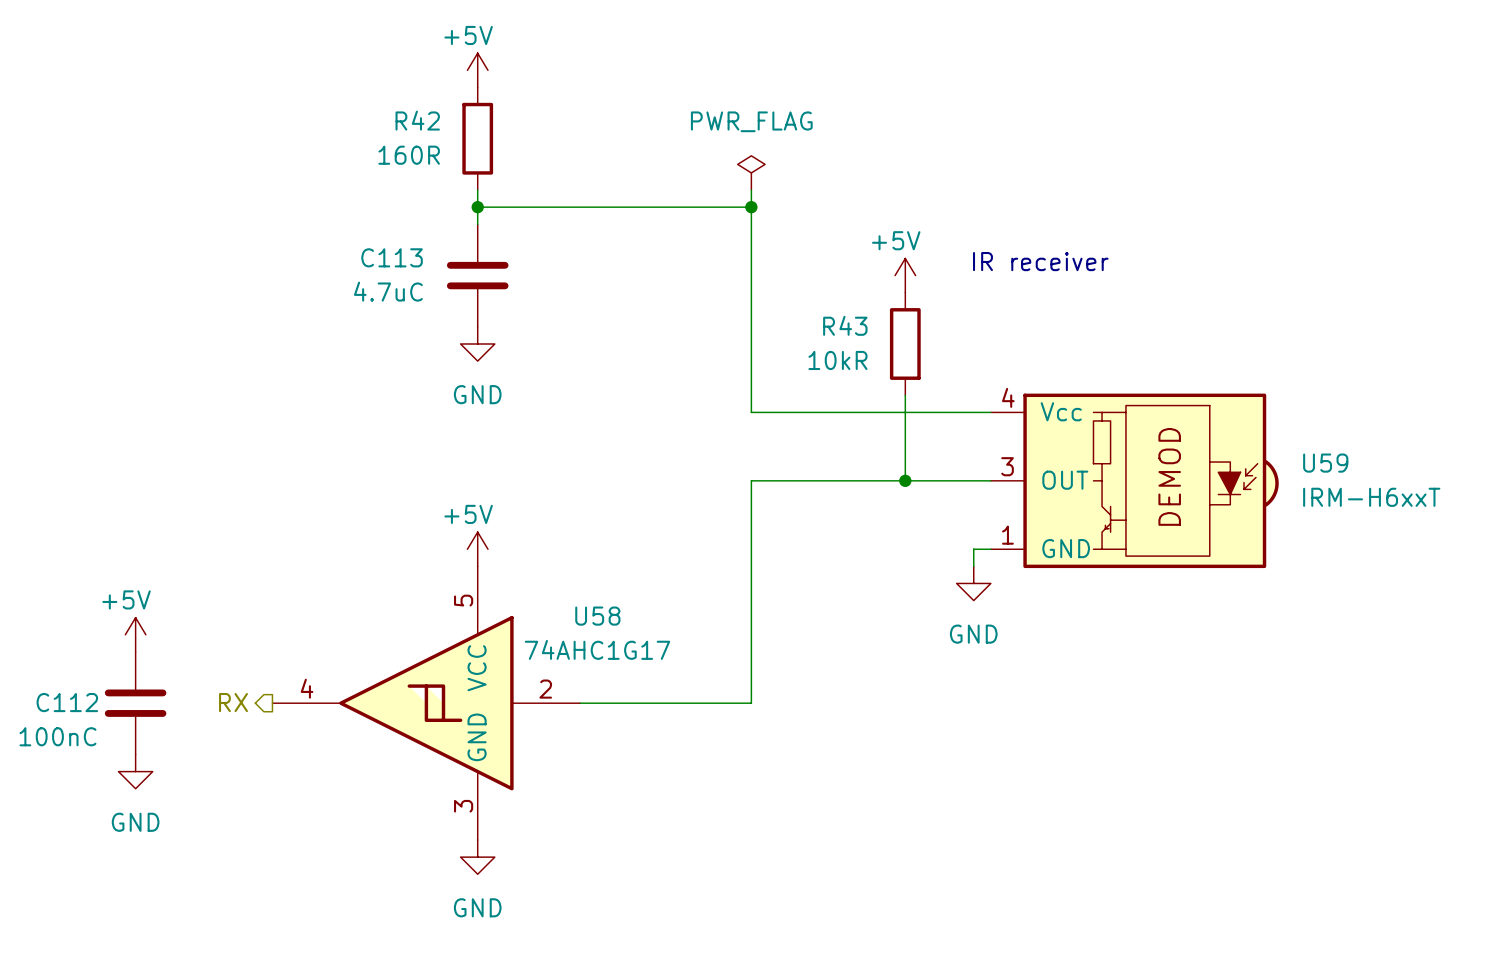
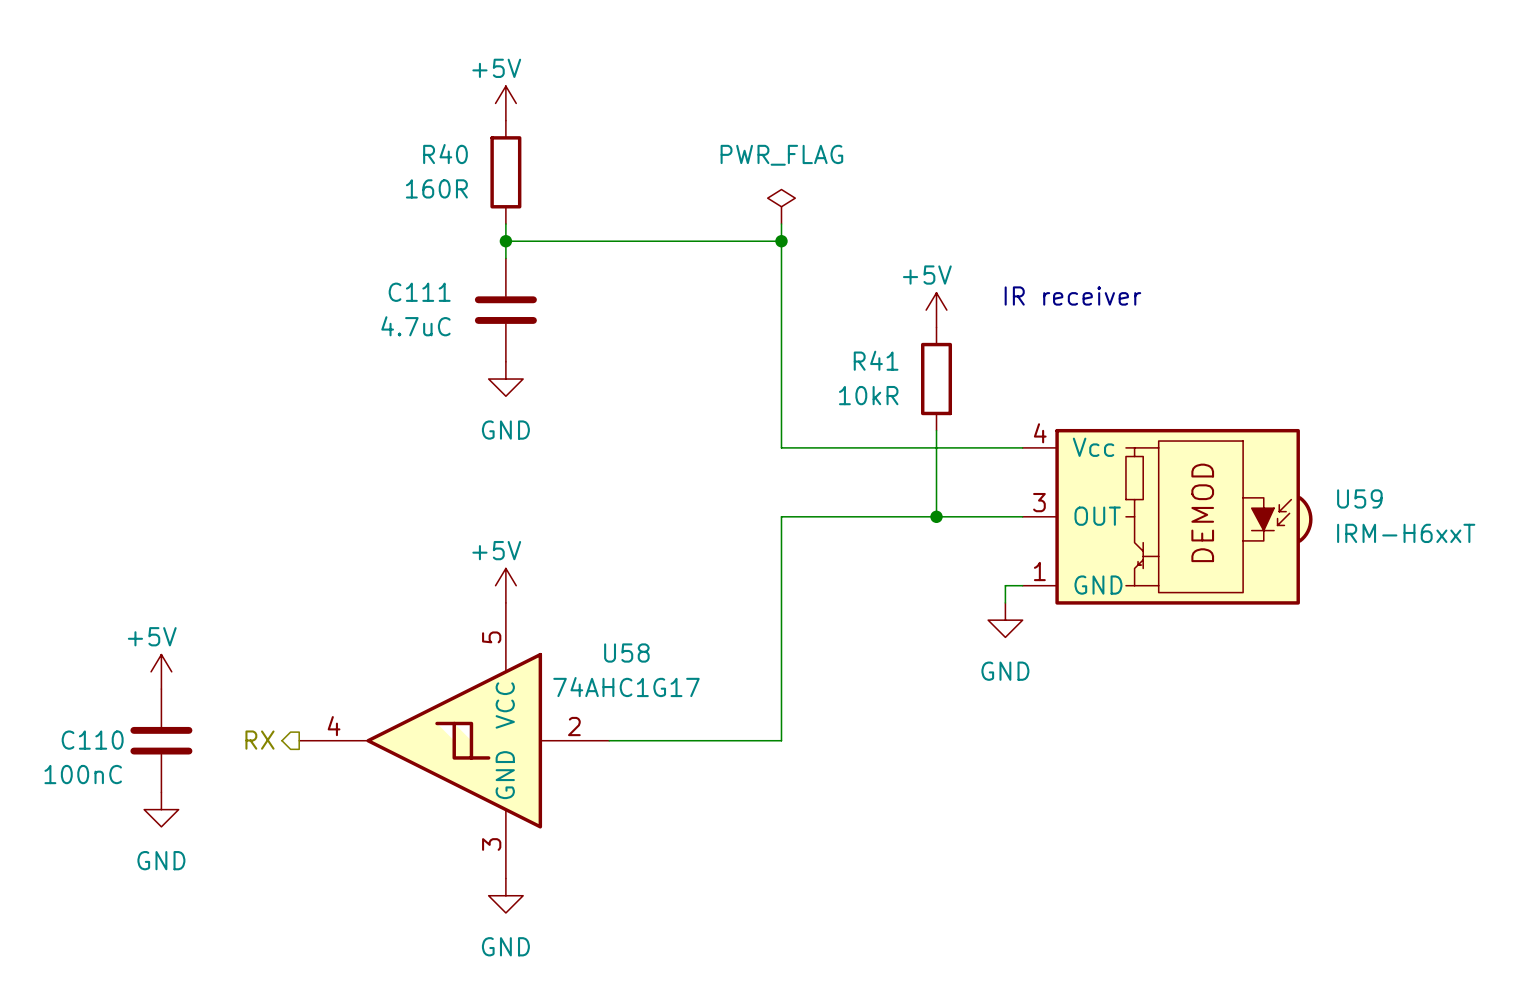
R42 name: R42 (417, 120) -> R40 (445, 154)
C113 name: C113 (392, 257) -> C111 (419, 292)
R43 name: R43 (845, 325) -> R41 (876, 360)
C112 name: C112 (67, 702) -> C110 (92, 740)

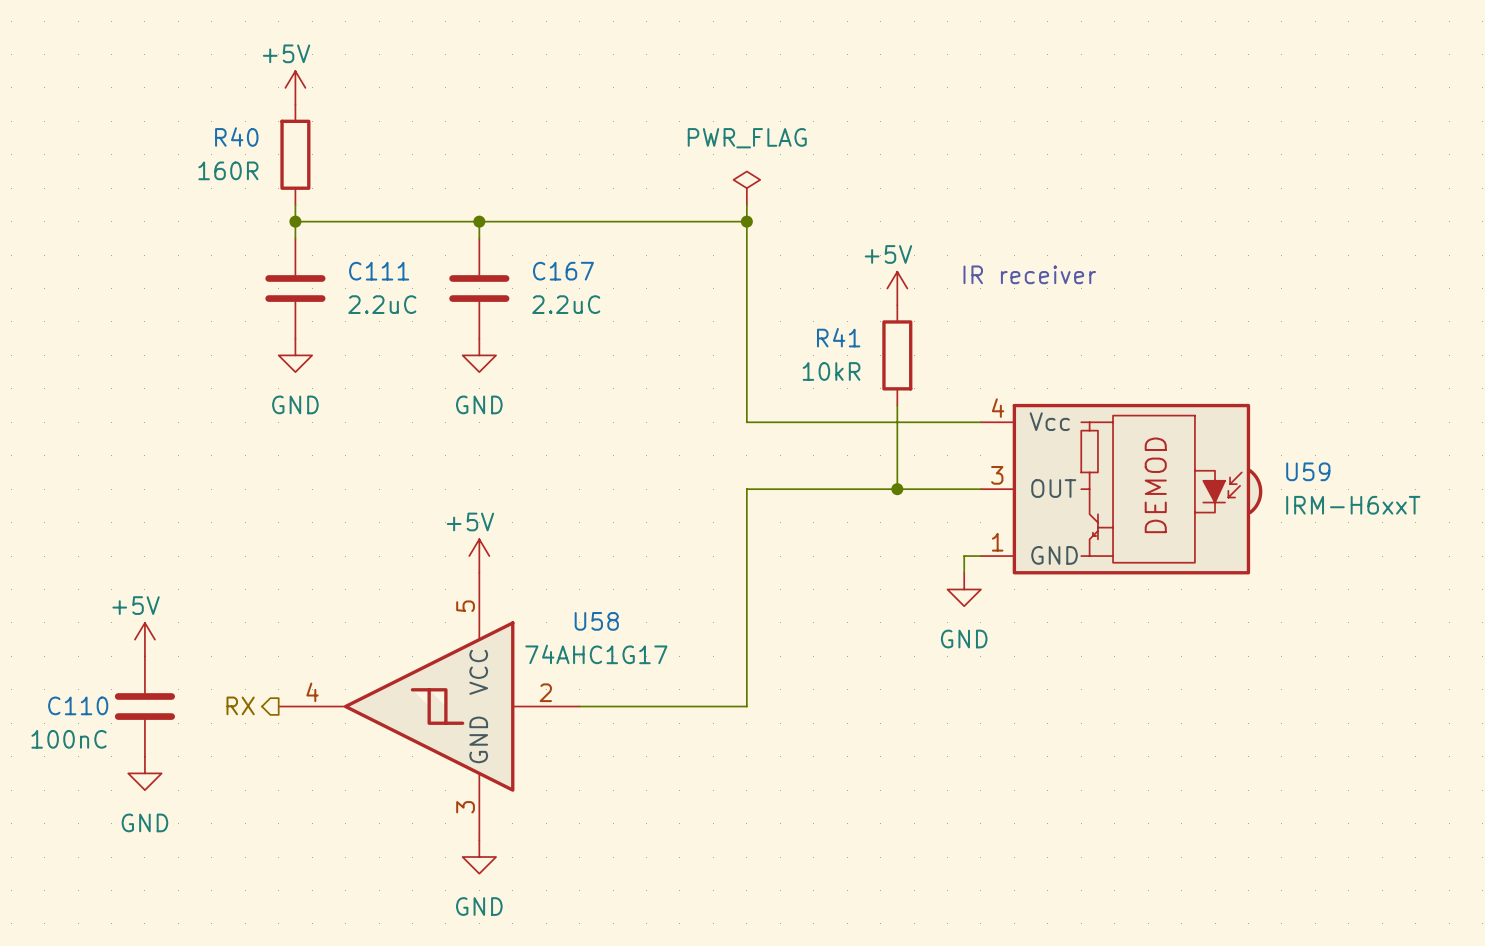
power symbol position: +5V (505, 103) -> +5V (295, 87)
R40 position: (505, 172) -> (295, 154)
wire: none -> (295, 204) (295, 238)
wire: (505, 223) (505, 241) -> (295, 221) (479, 221)
junction: none -> (295, 221)
C111 name: C111 (419, 292) -> C167 (563, 271)
C111: none -> 2.2uC (295, 288)
C111 value: 4.7uC (415, 326) -> 2.2uC (566, 304)
power symbol: none -> GND (295, 355)

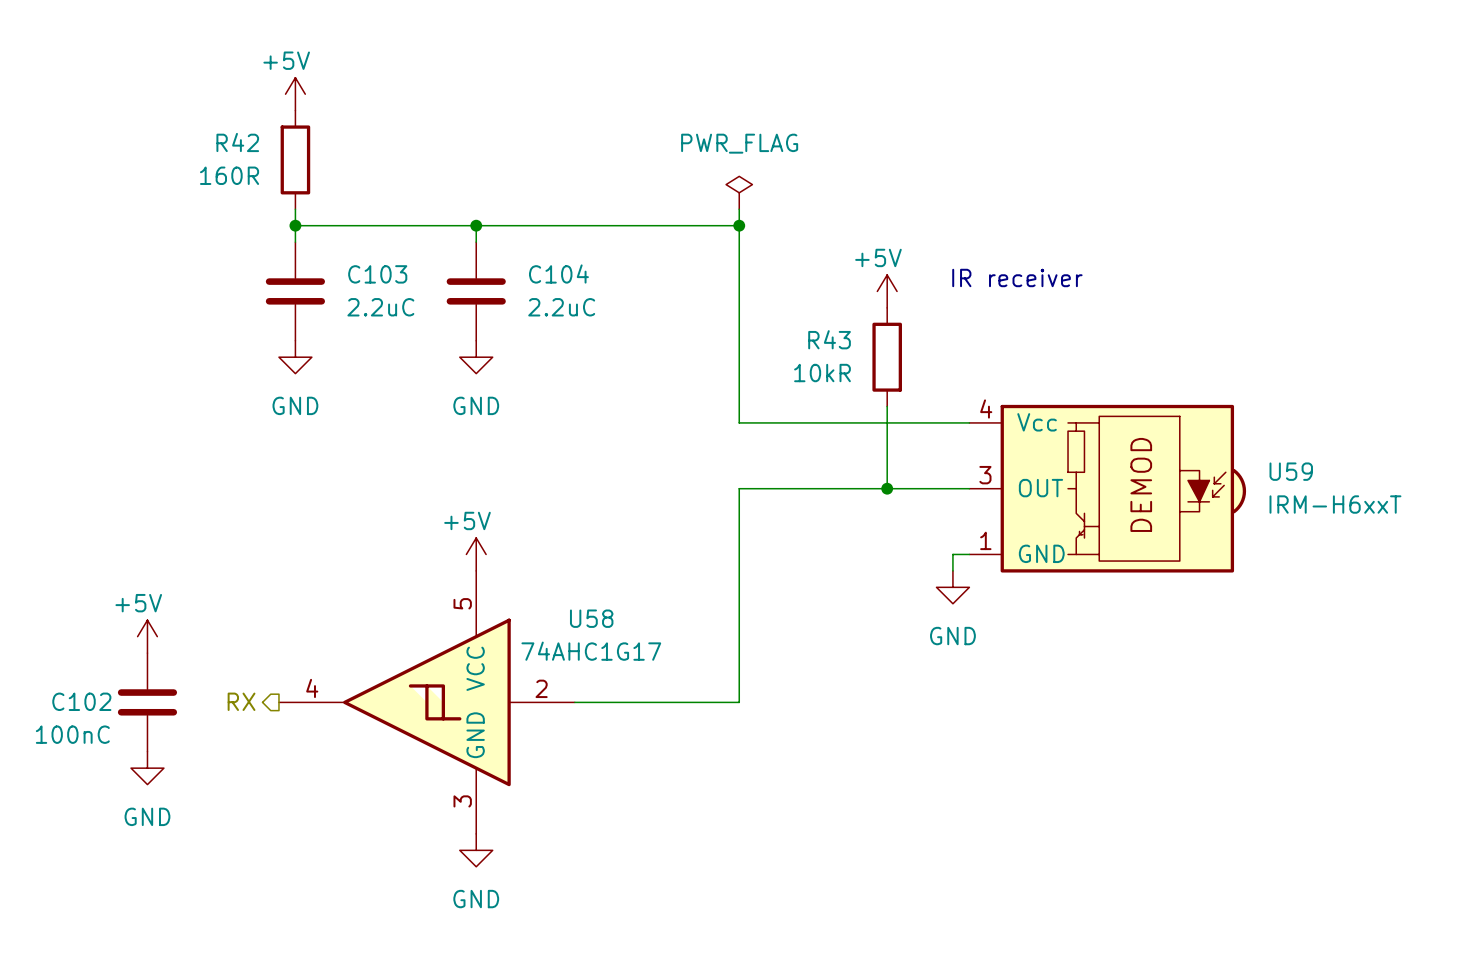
R40 name: R40 (236, 137) -> R42 (237, 142)
C111 name: C111 (379, 271) -> C103 (377, 274)
C167 name: C167 (563, 271) -> C104 (558, 274)
R41 name: R41 (838, 337) -> R43 (829, 339)
C110 name: C110 (78, 705) -> C102 (81, 701)

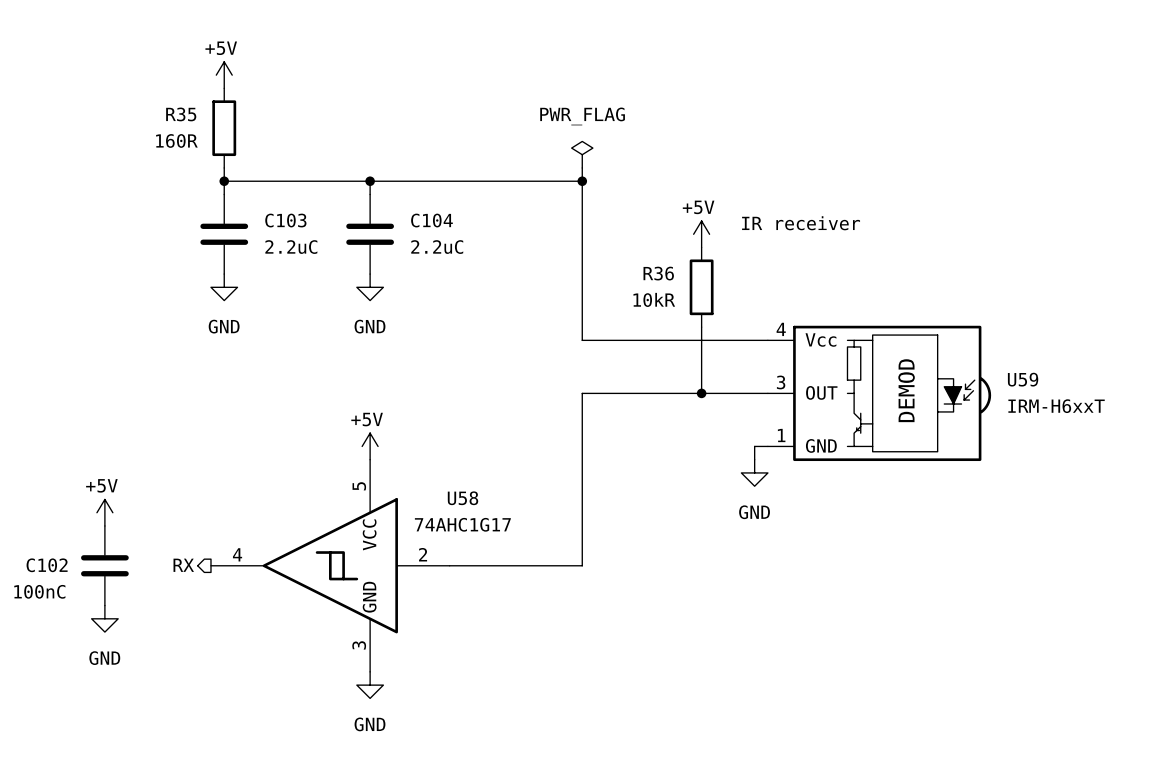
R42 name: R42 (237, 142) -> R35 (181, 114)
R43 name: R43 (829, 339) -> R36 (658, 273)

